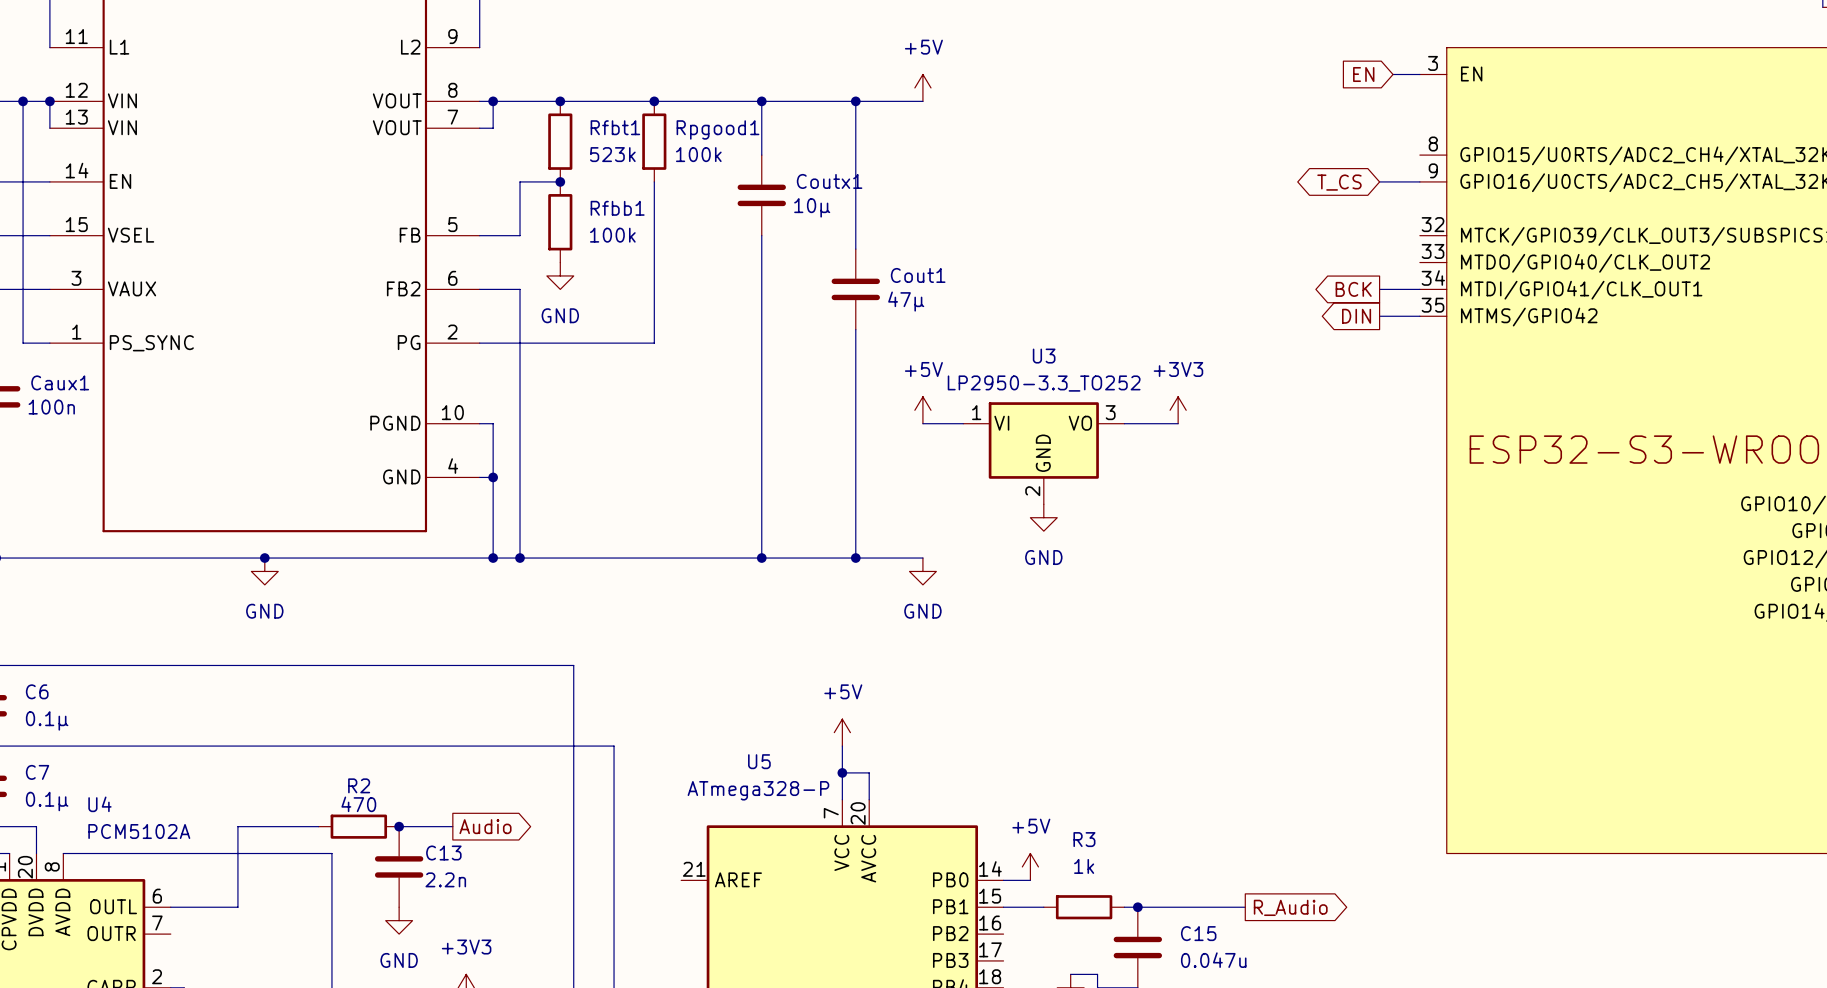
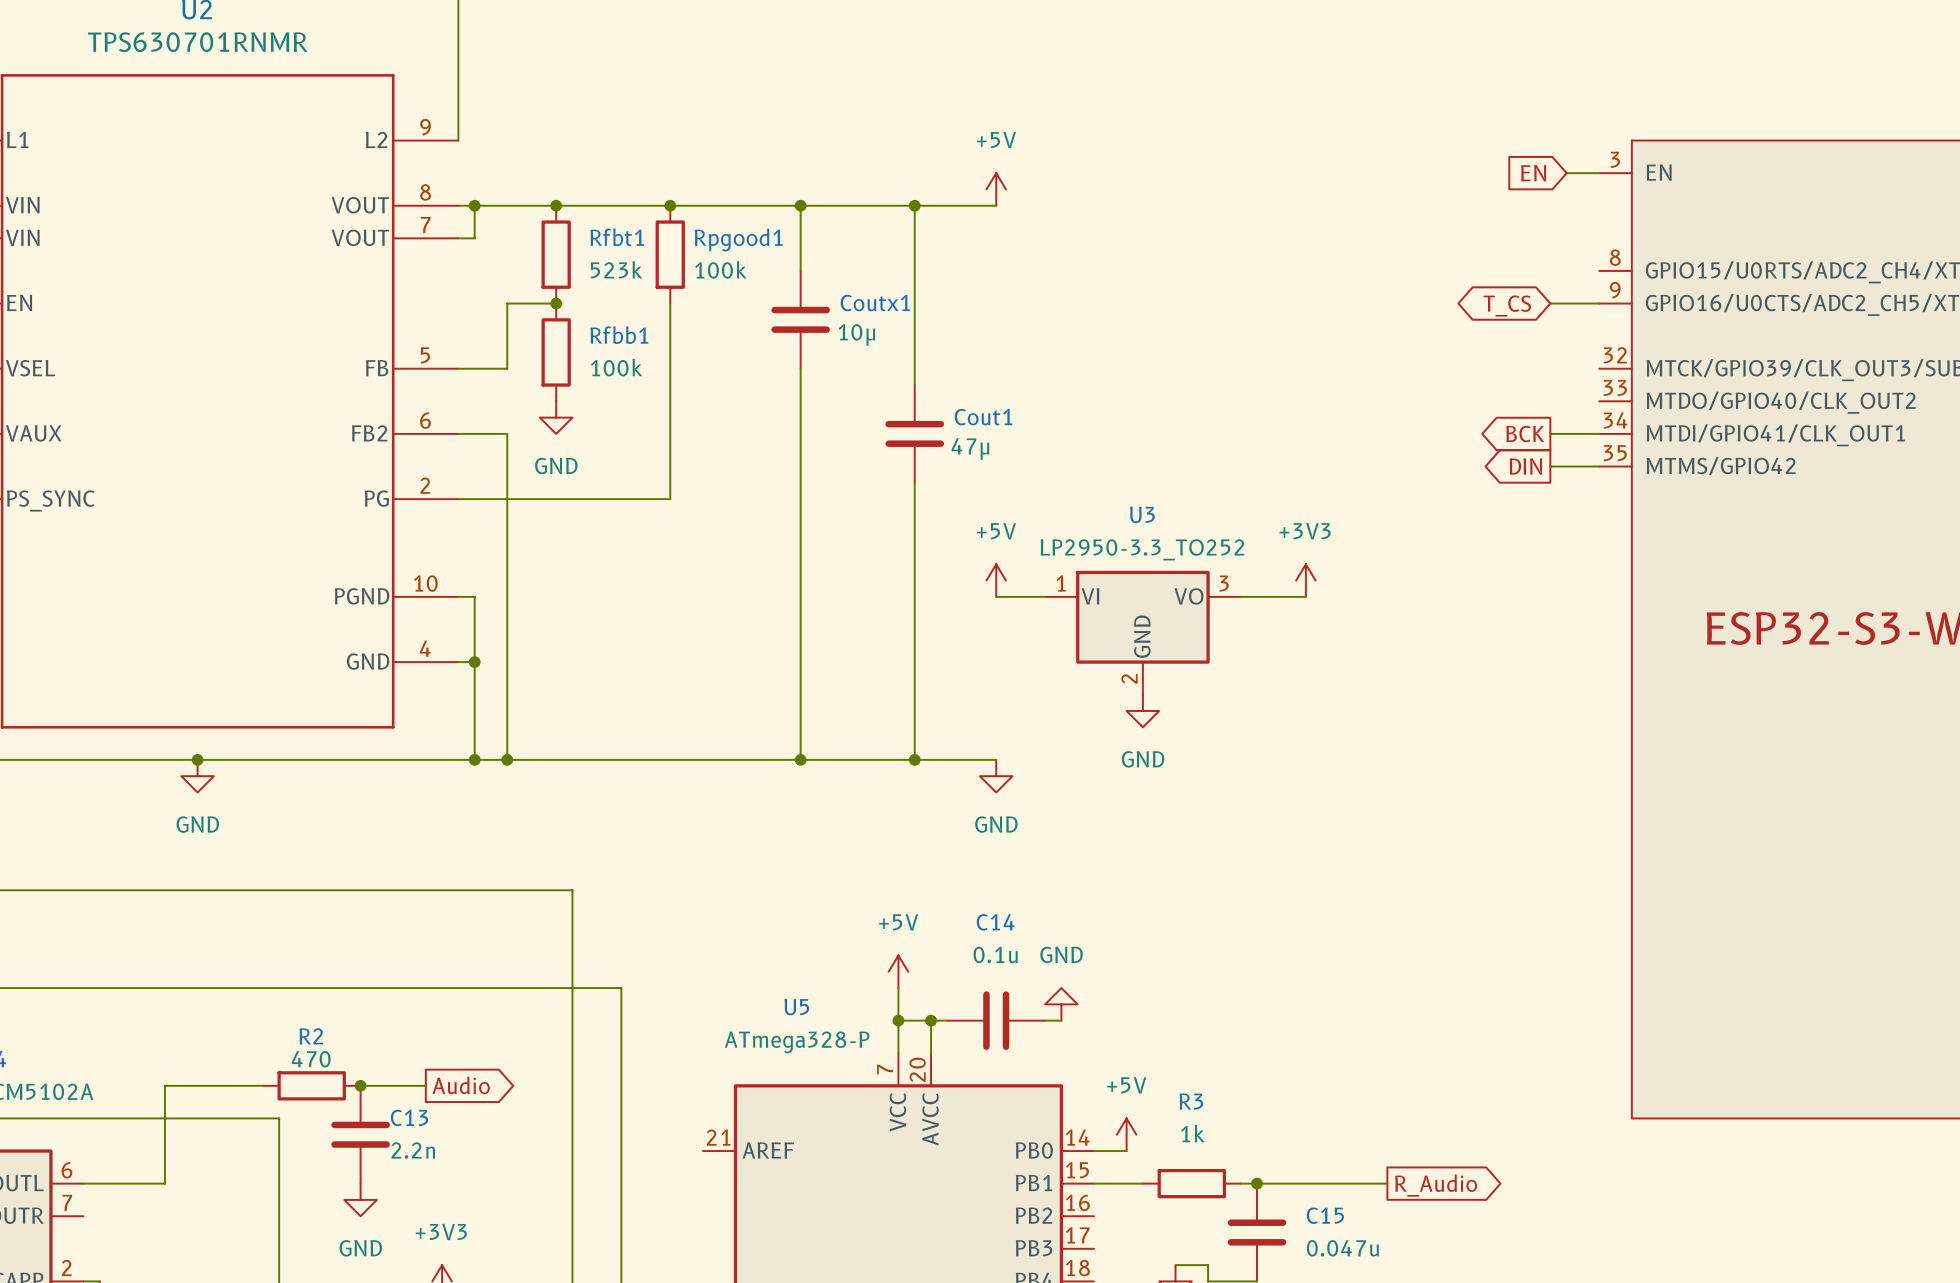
power symbol: none -> GND (1061, 1004)
wire: none -> (931, 1020) (947, 1020)
junction: none -> (931, 1020)
C14: none -> 0.1u (996, 1020)
wire: none -> (1045, 1020) (1061, 1020)

